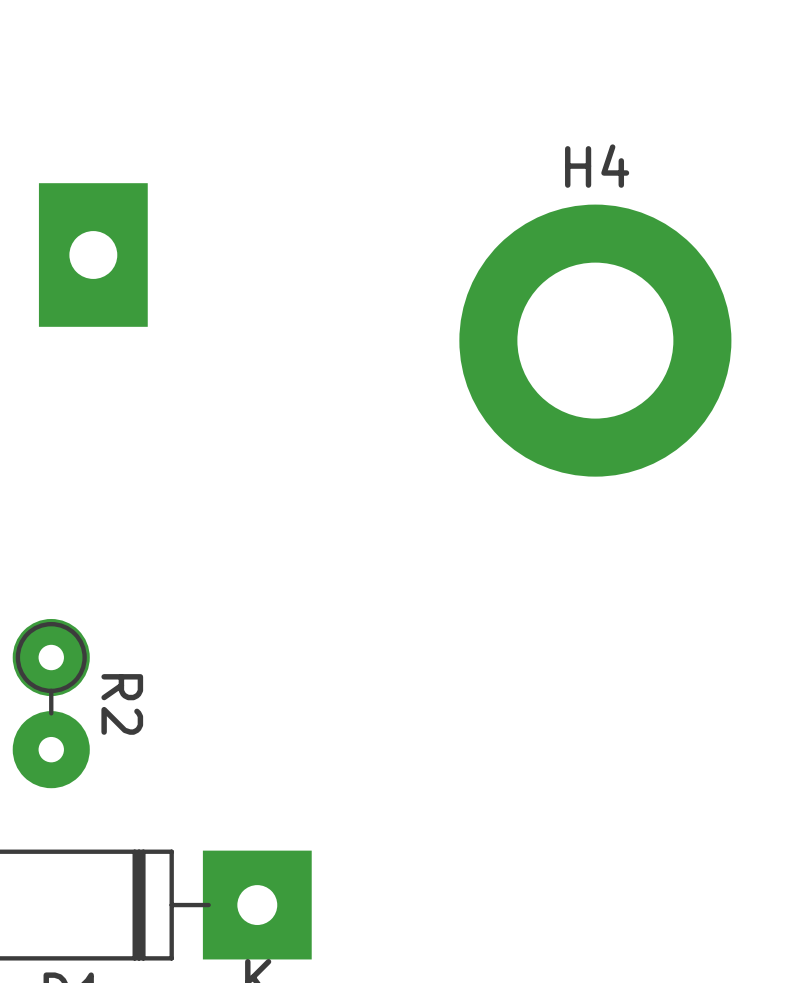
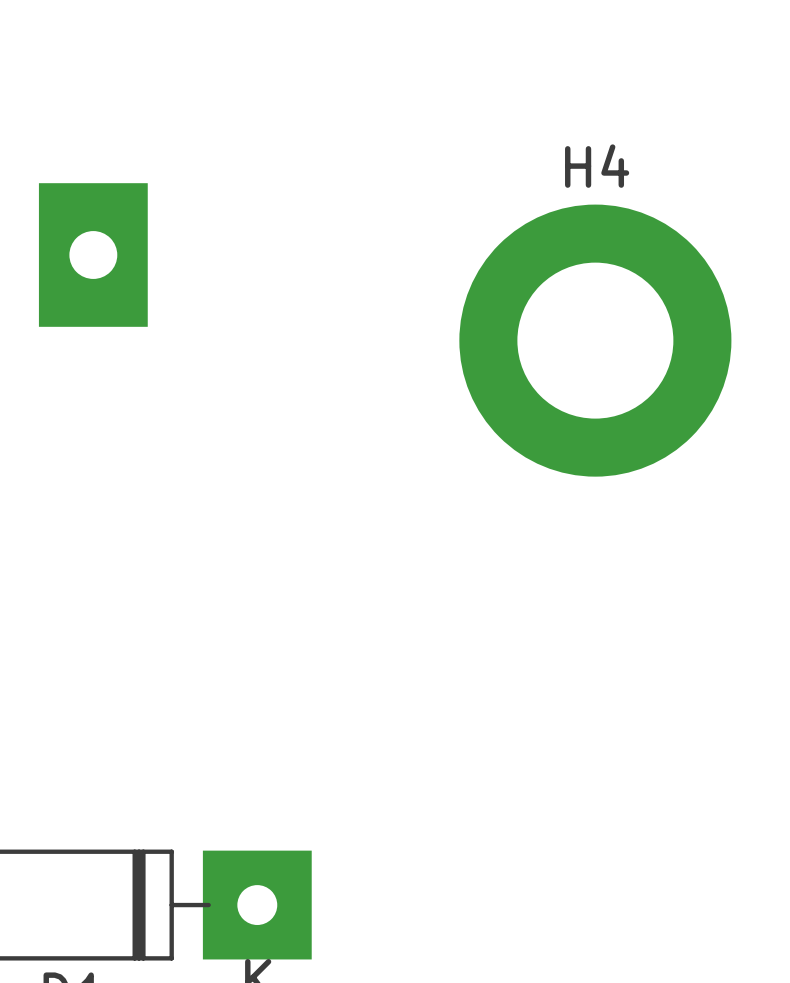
R2: (51, 703) -> none

